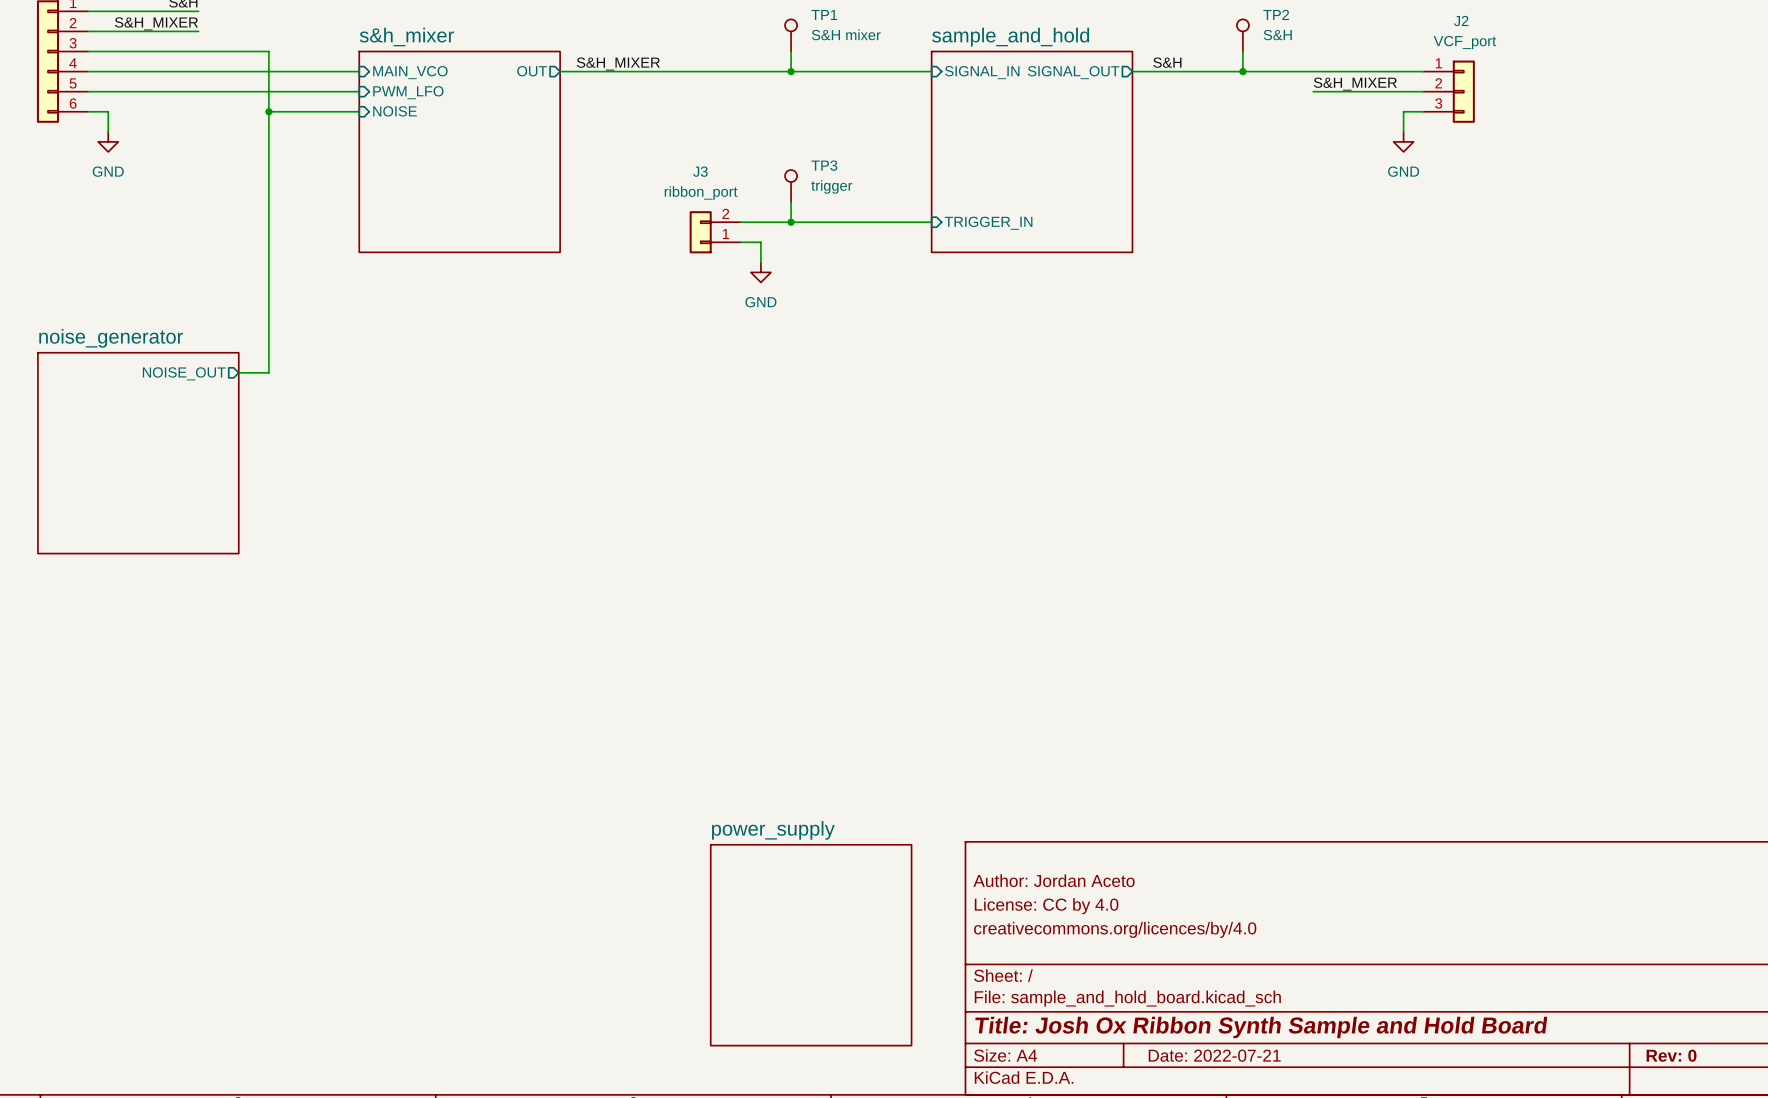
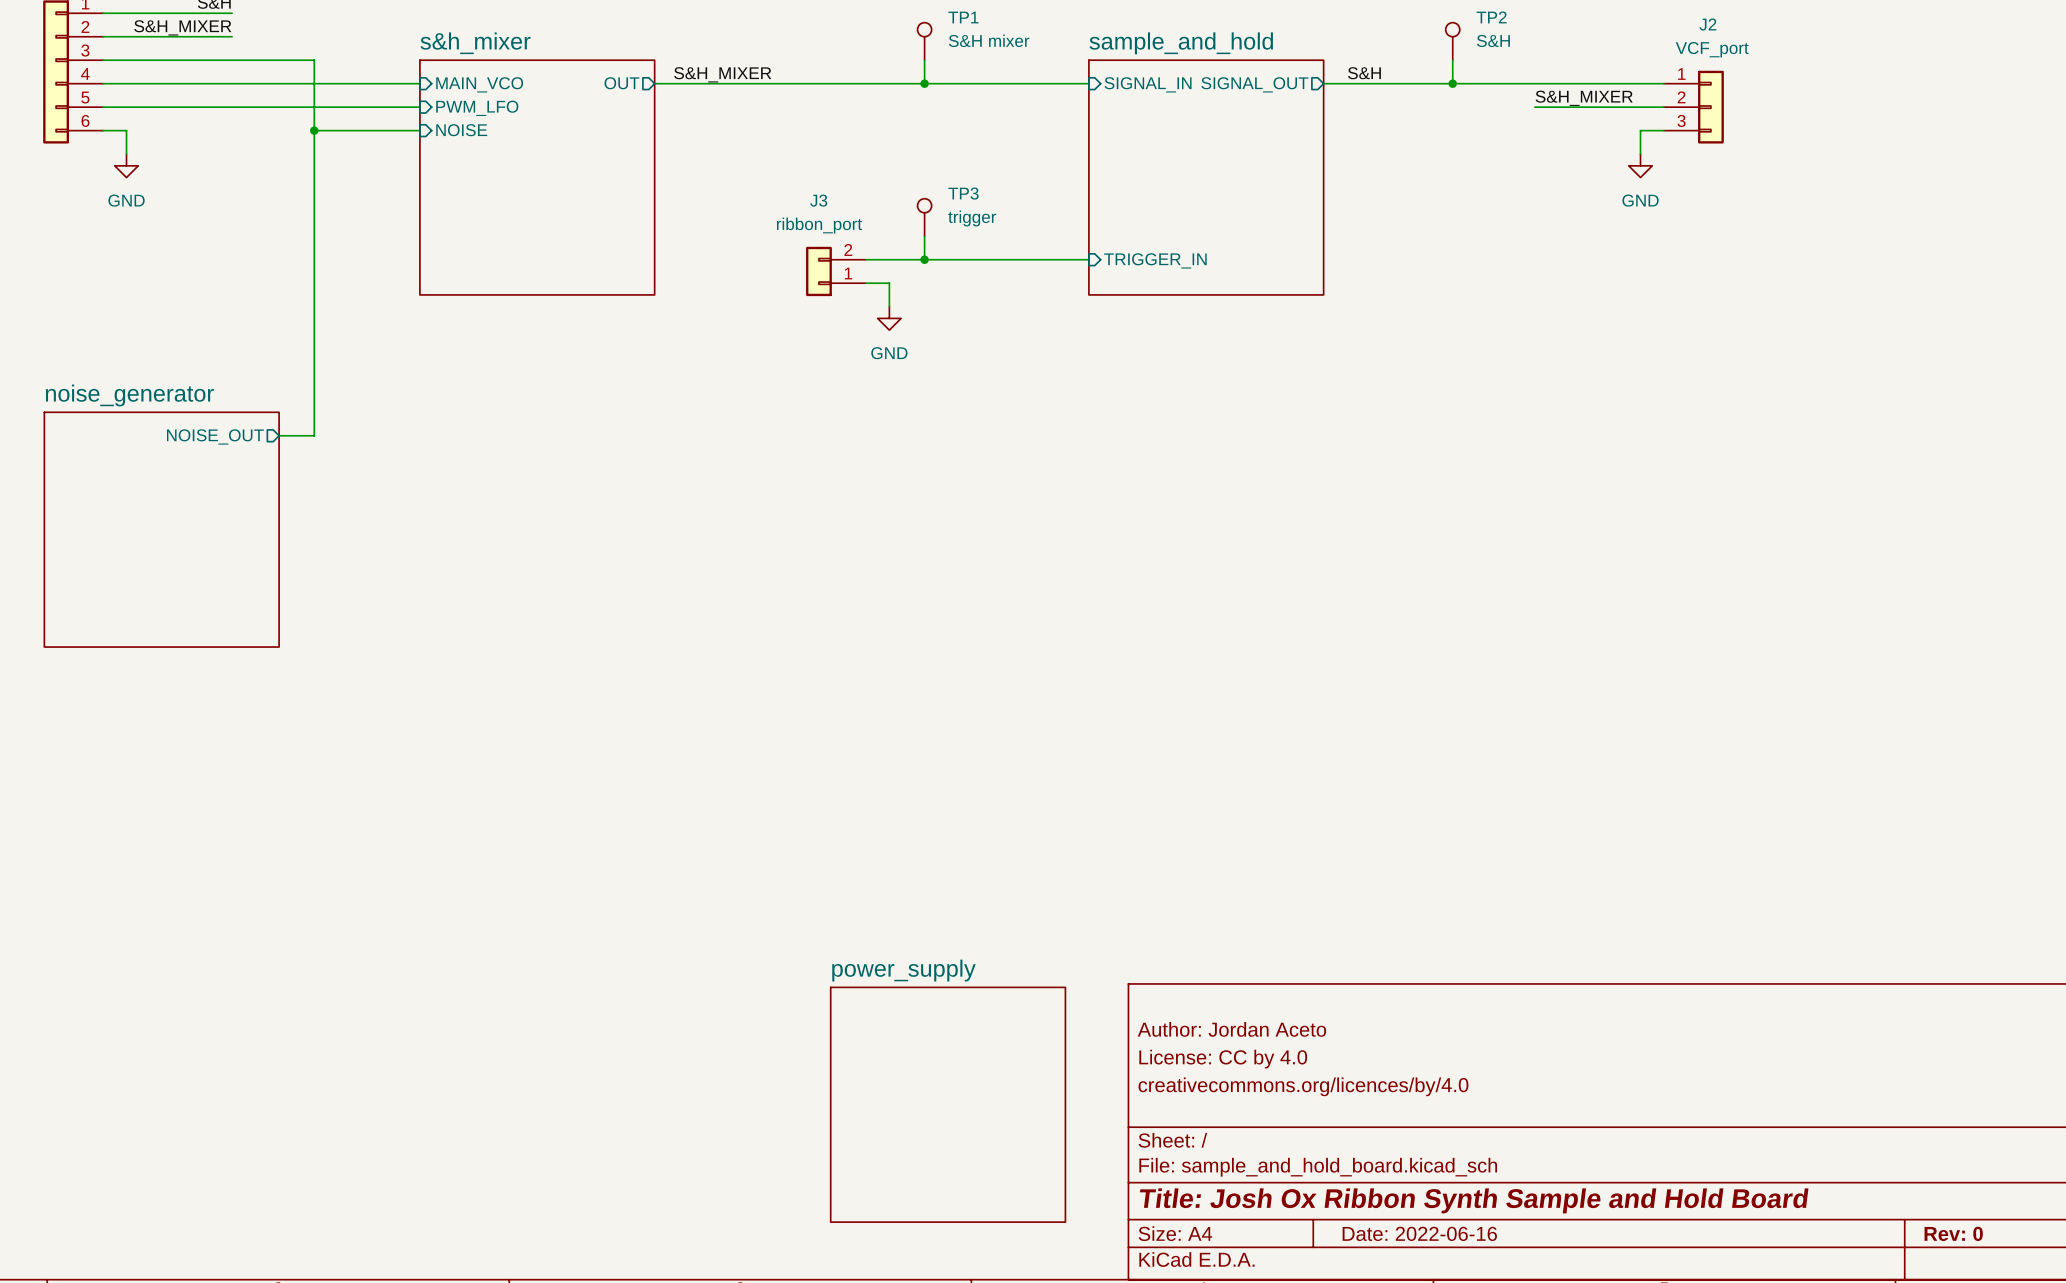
title block: Date: 2022-07-21 (1214, 1055) -> Date: 2022-06-16 (1419, 1233)

